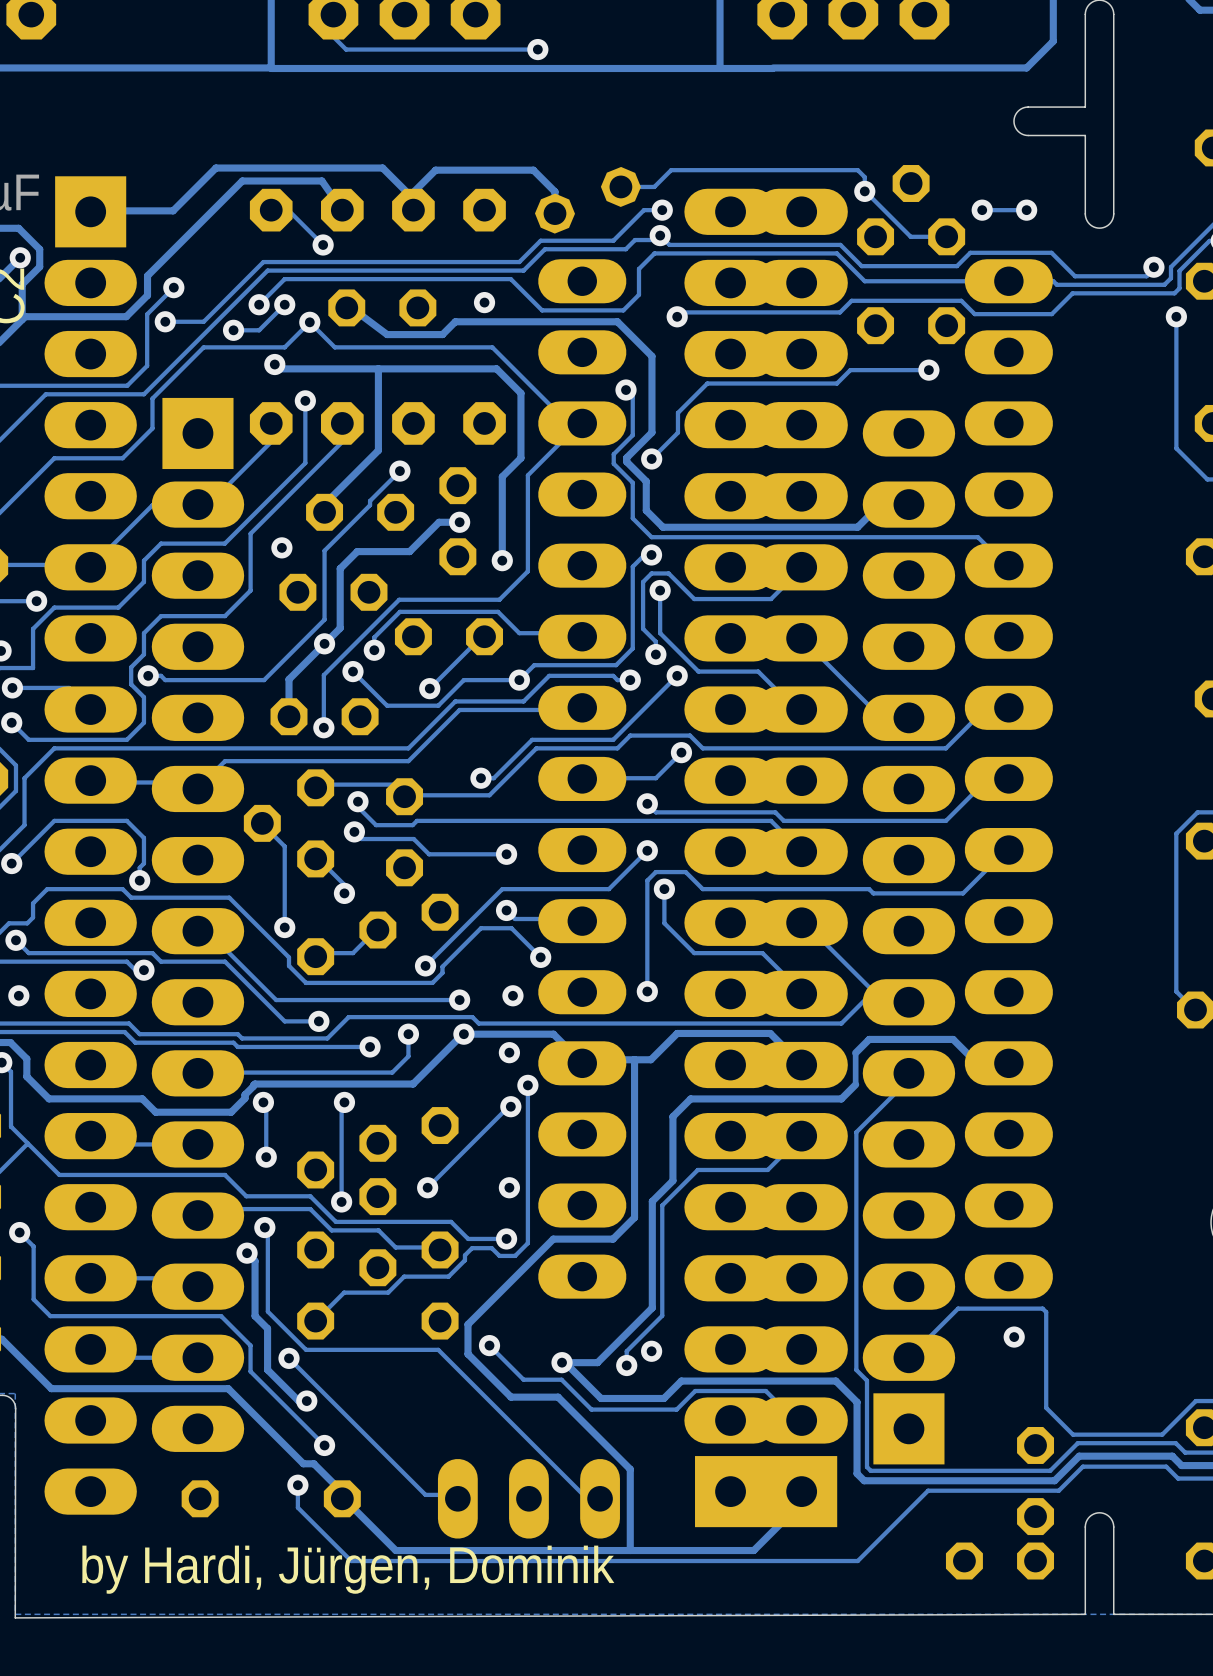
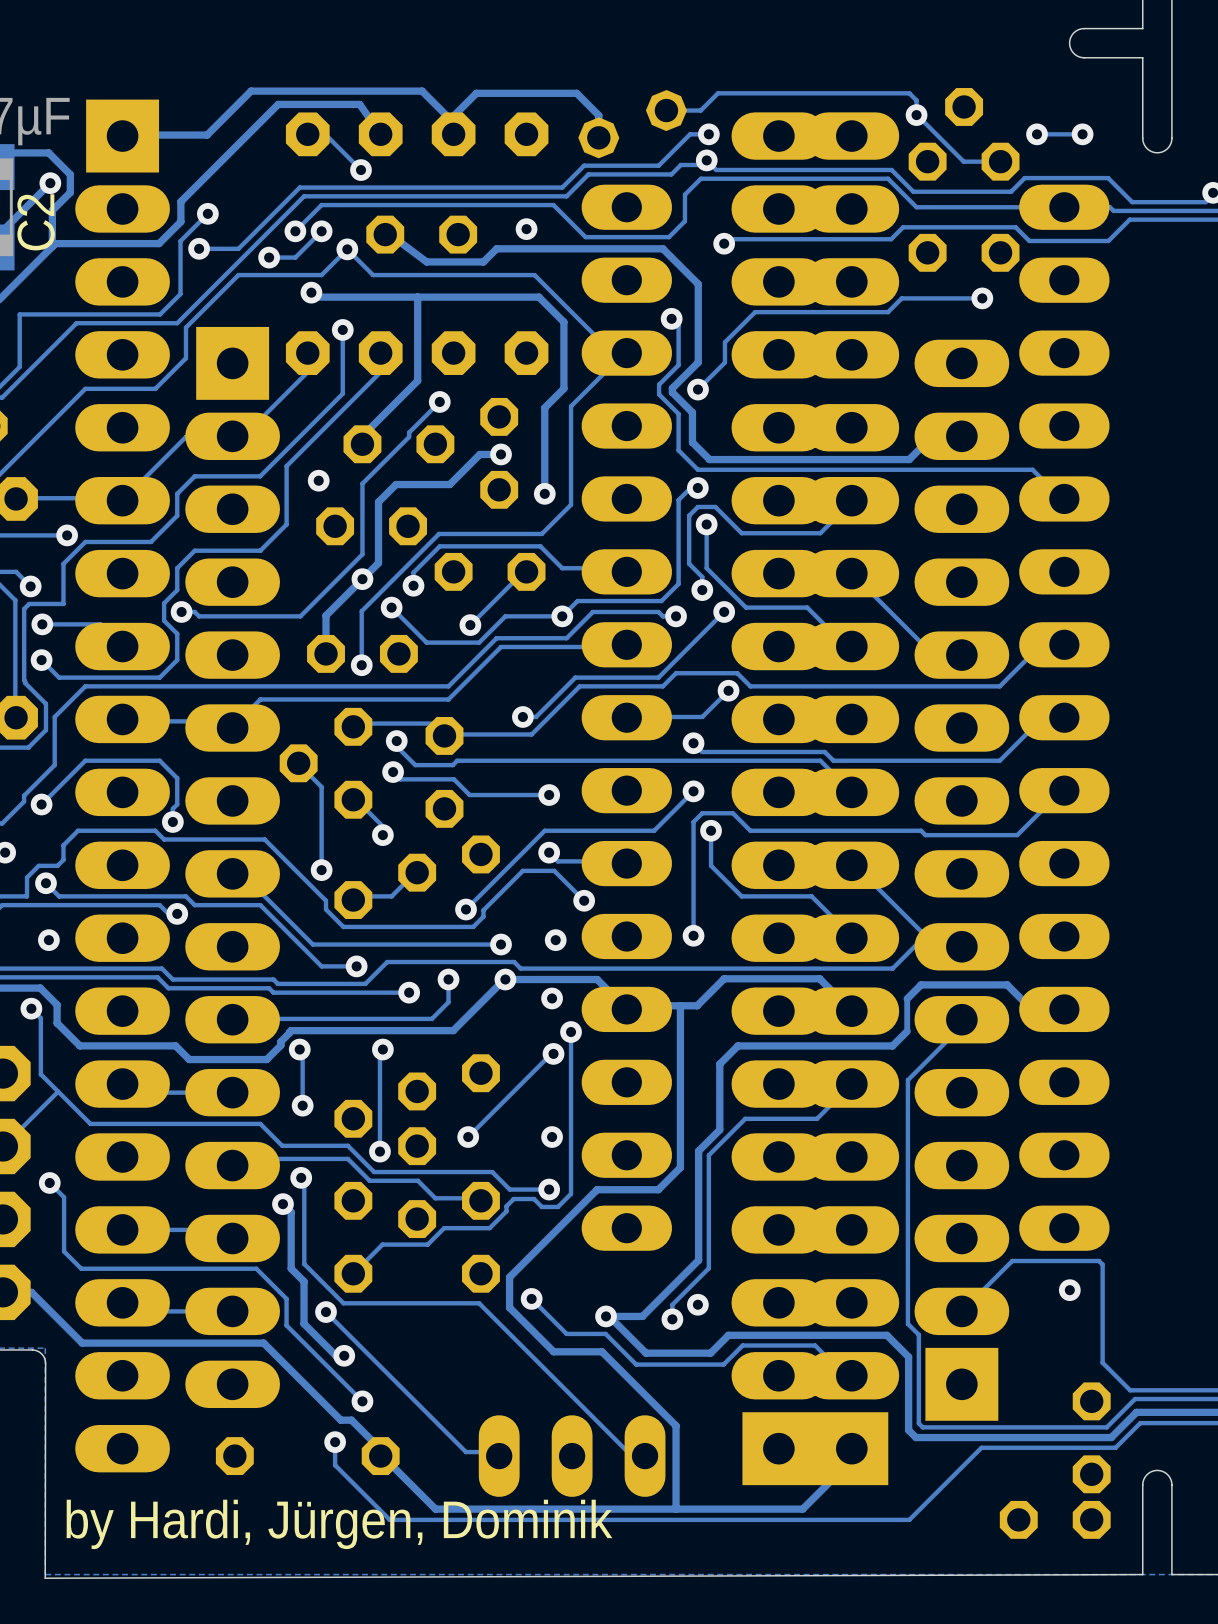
text position: by Hardi, Jürgen, Dominik (348, 1569) -> by Hardi, Jürgen, Dominik (339, 1524)

